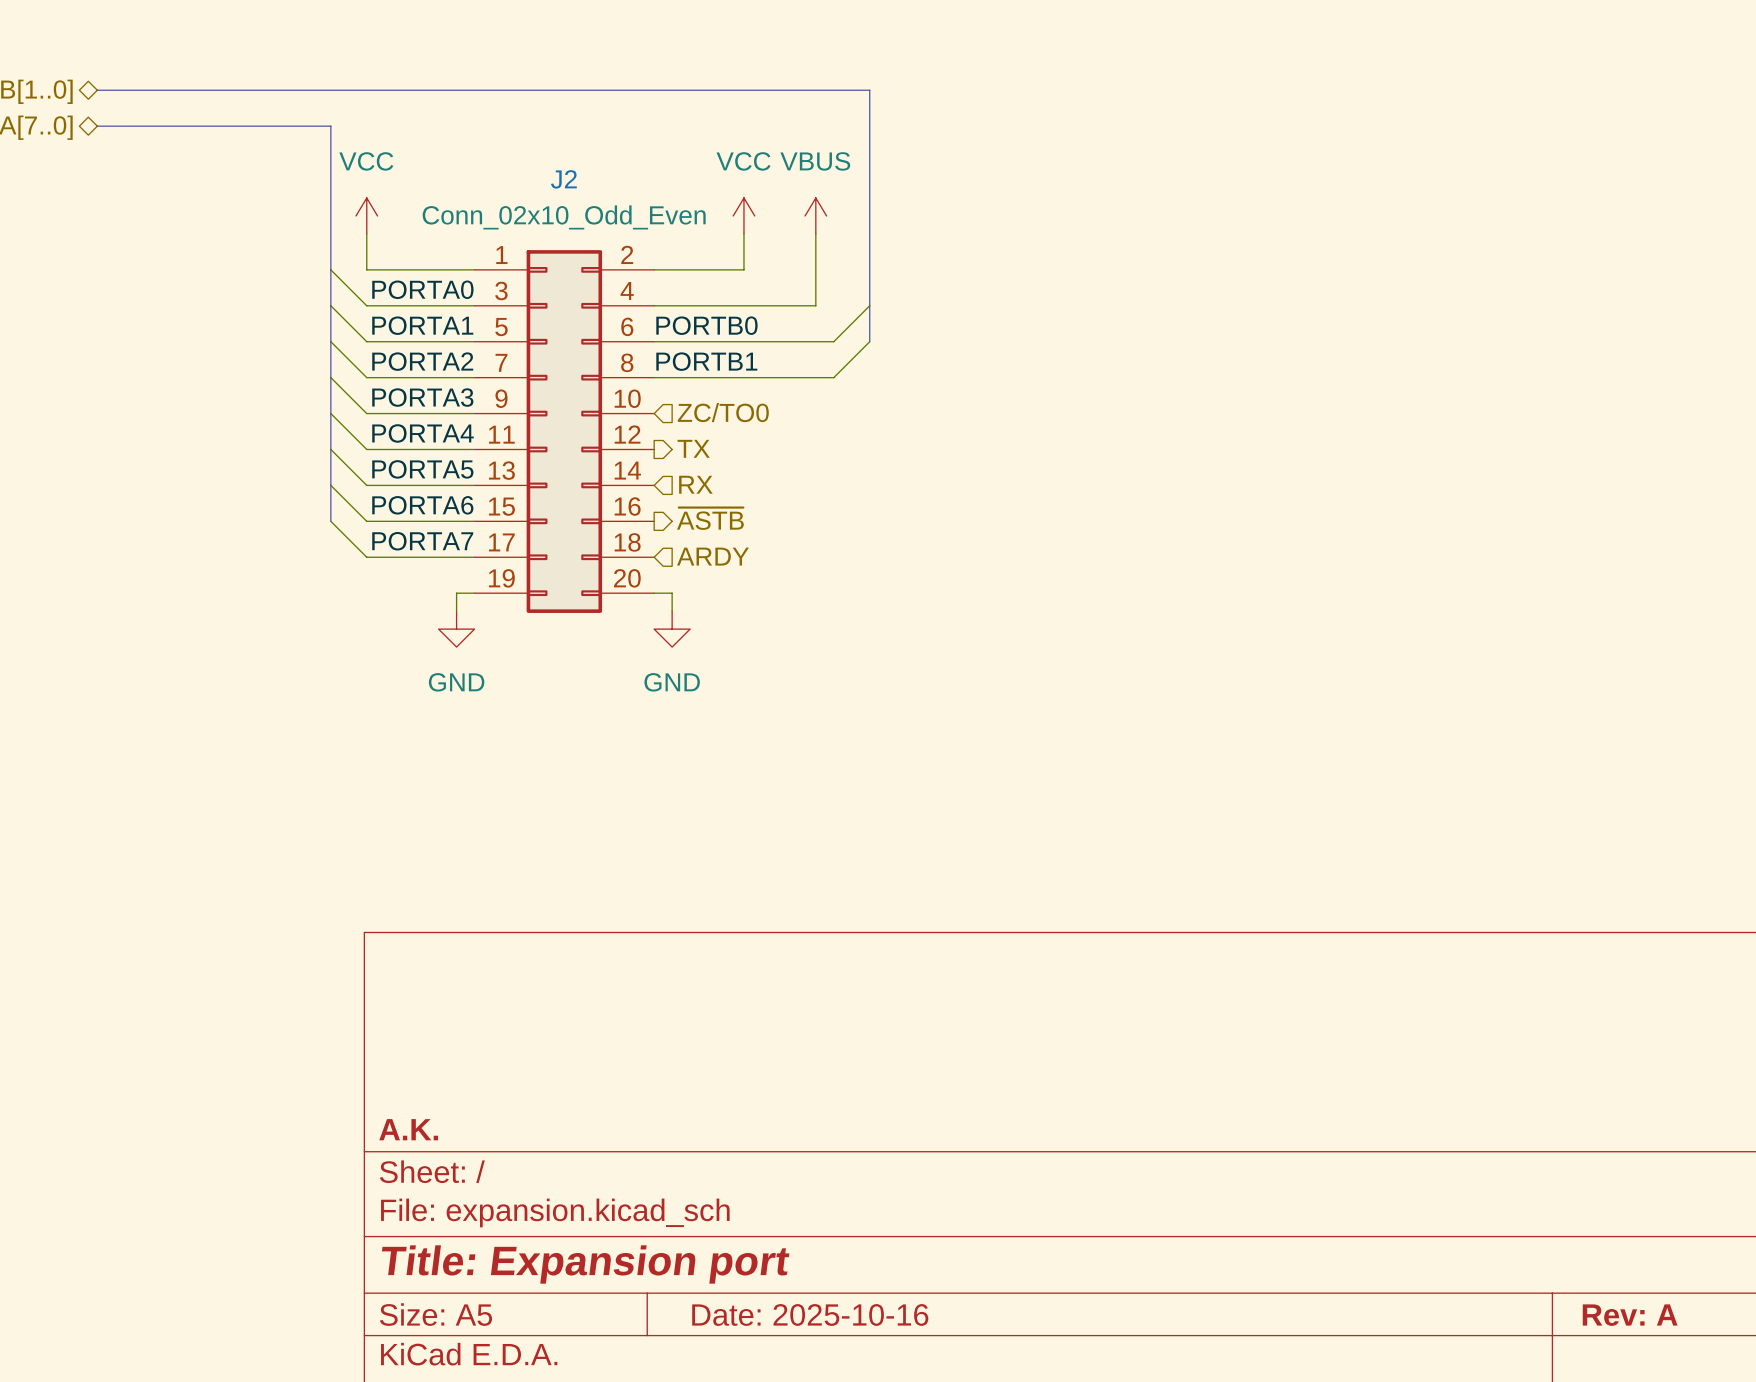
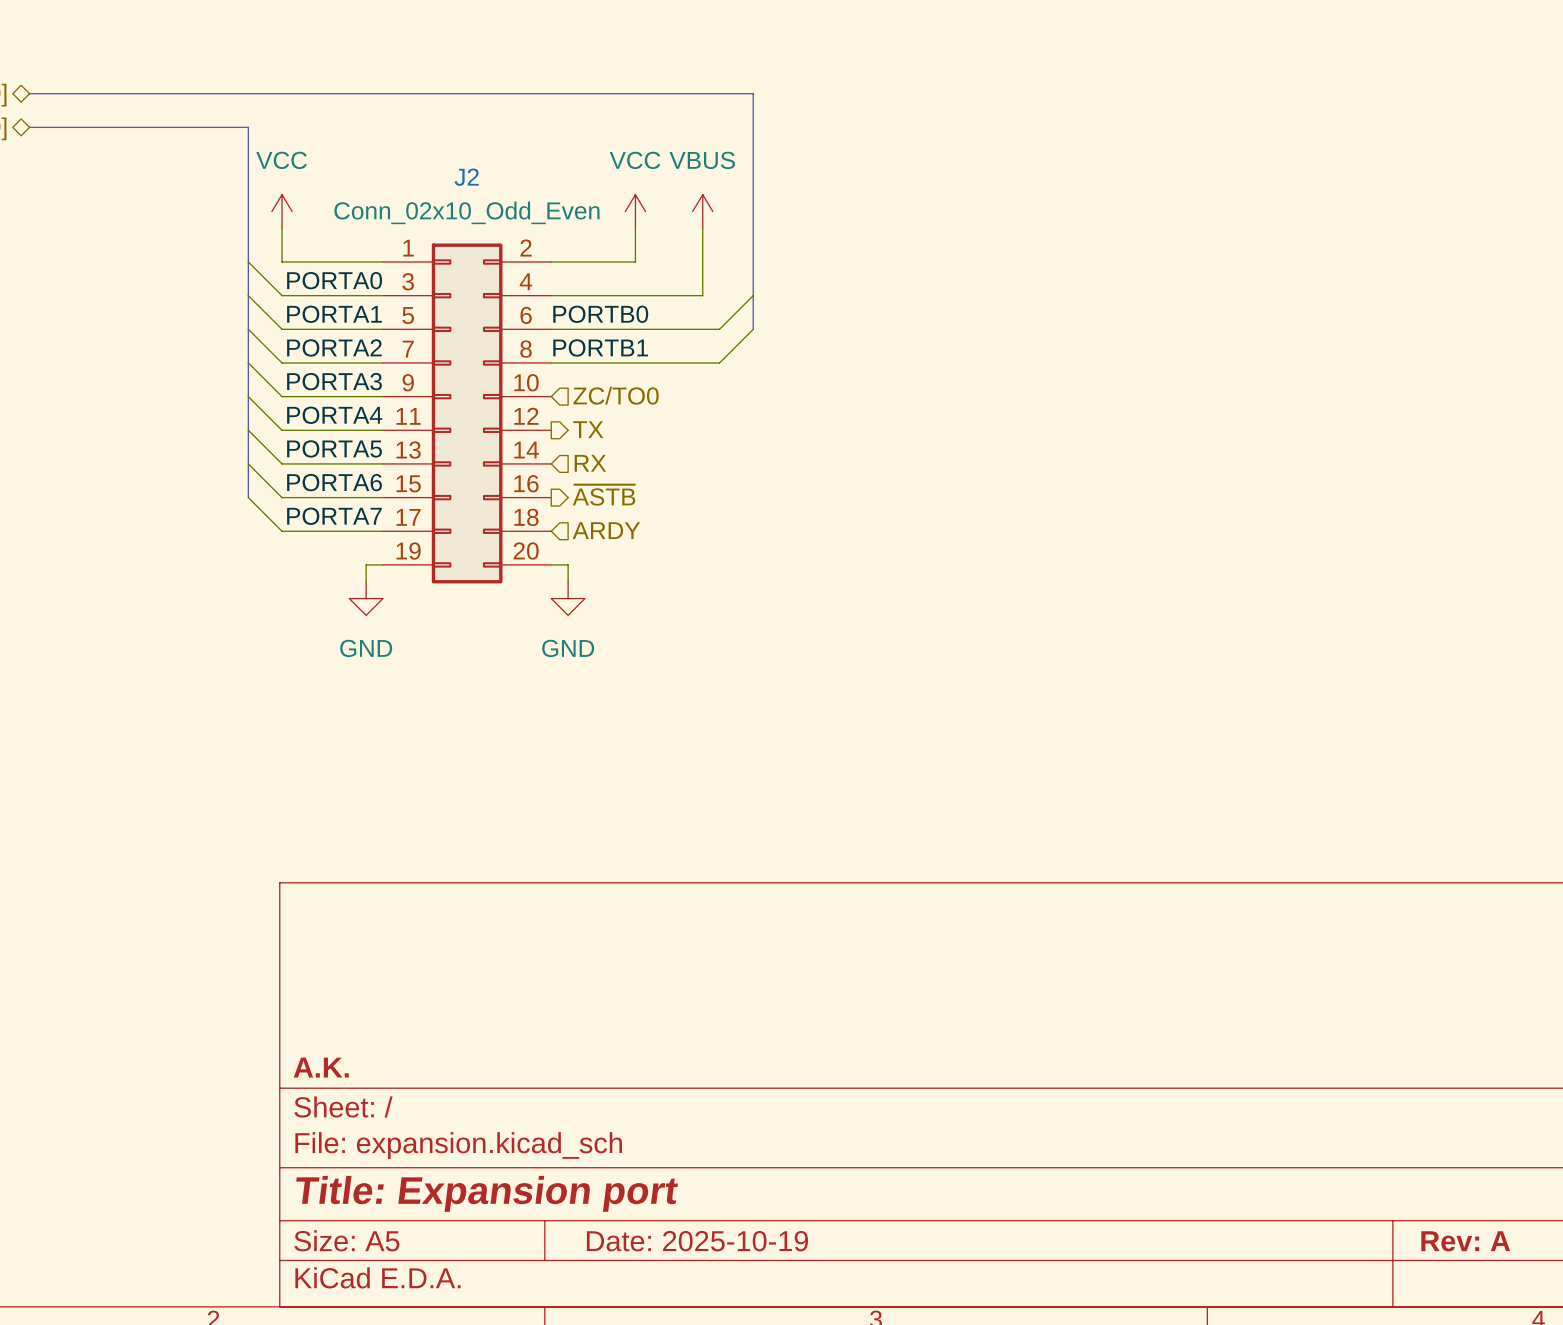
title block: Date: 2025-10-16 (810, 1314) -> Date: 2025-10-19 (697, 1241)

